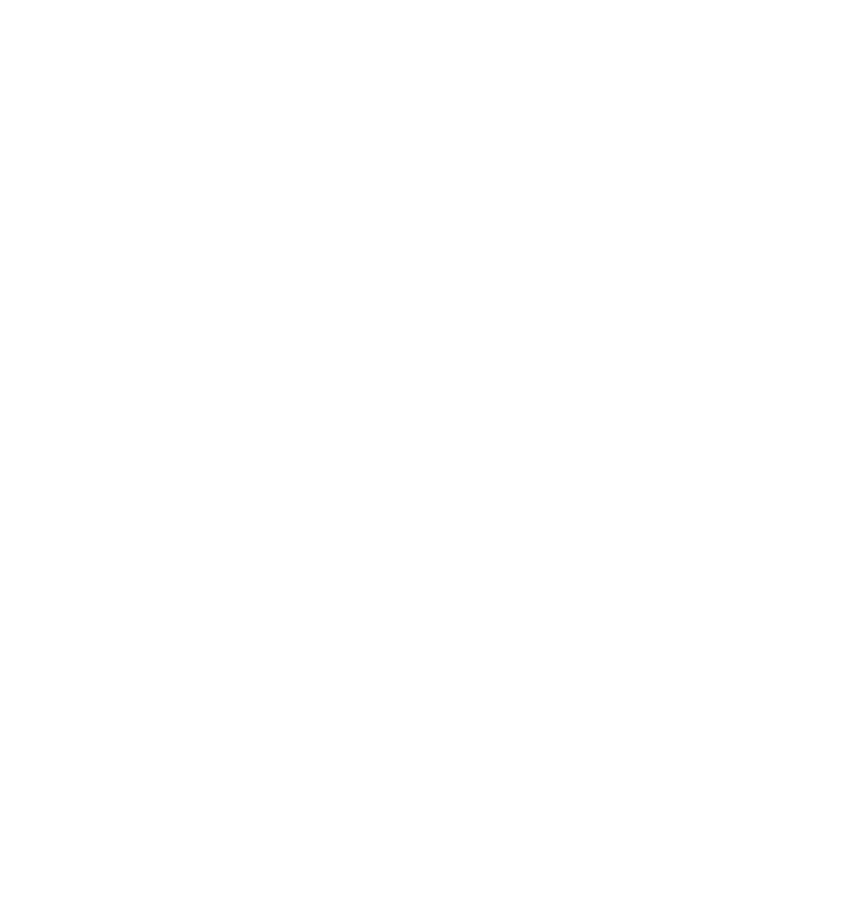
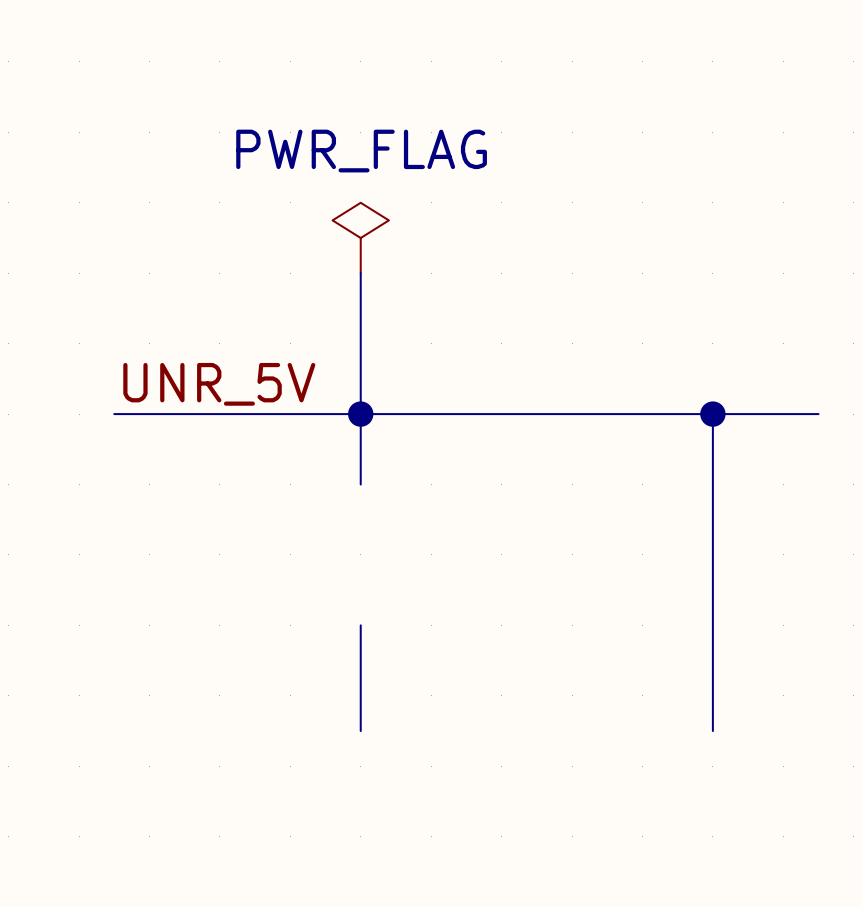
power symbol: none -> PWR_FLAG (360, 238)
wire: none -> (360, 273) (360, 484)
label: none -> UNR_5V (219, 384)
wire: none -> (114, 414) (818, 414)
junction: none -> (360, 414)
wire: none -> (712, 414) (712, 731)
junction: none -> (712, 414)
wire: none -> (360, 625) (360, 731)

